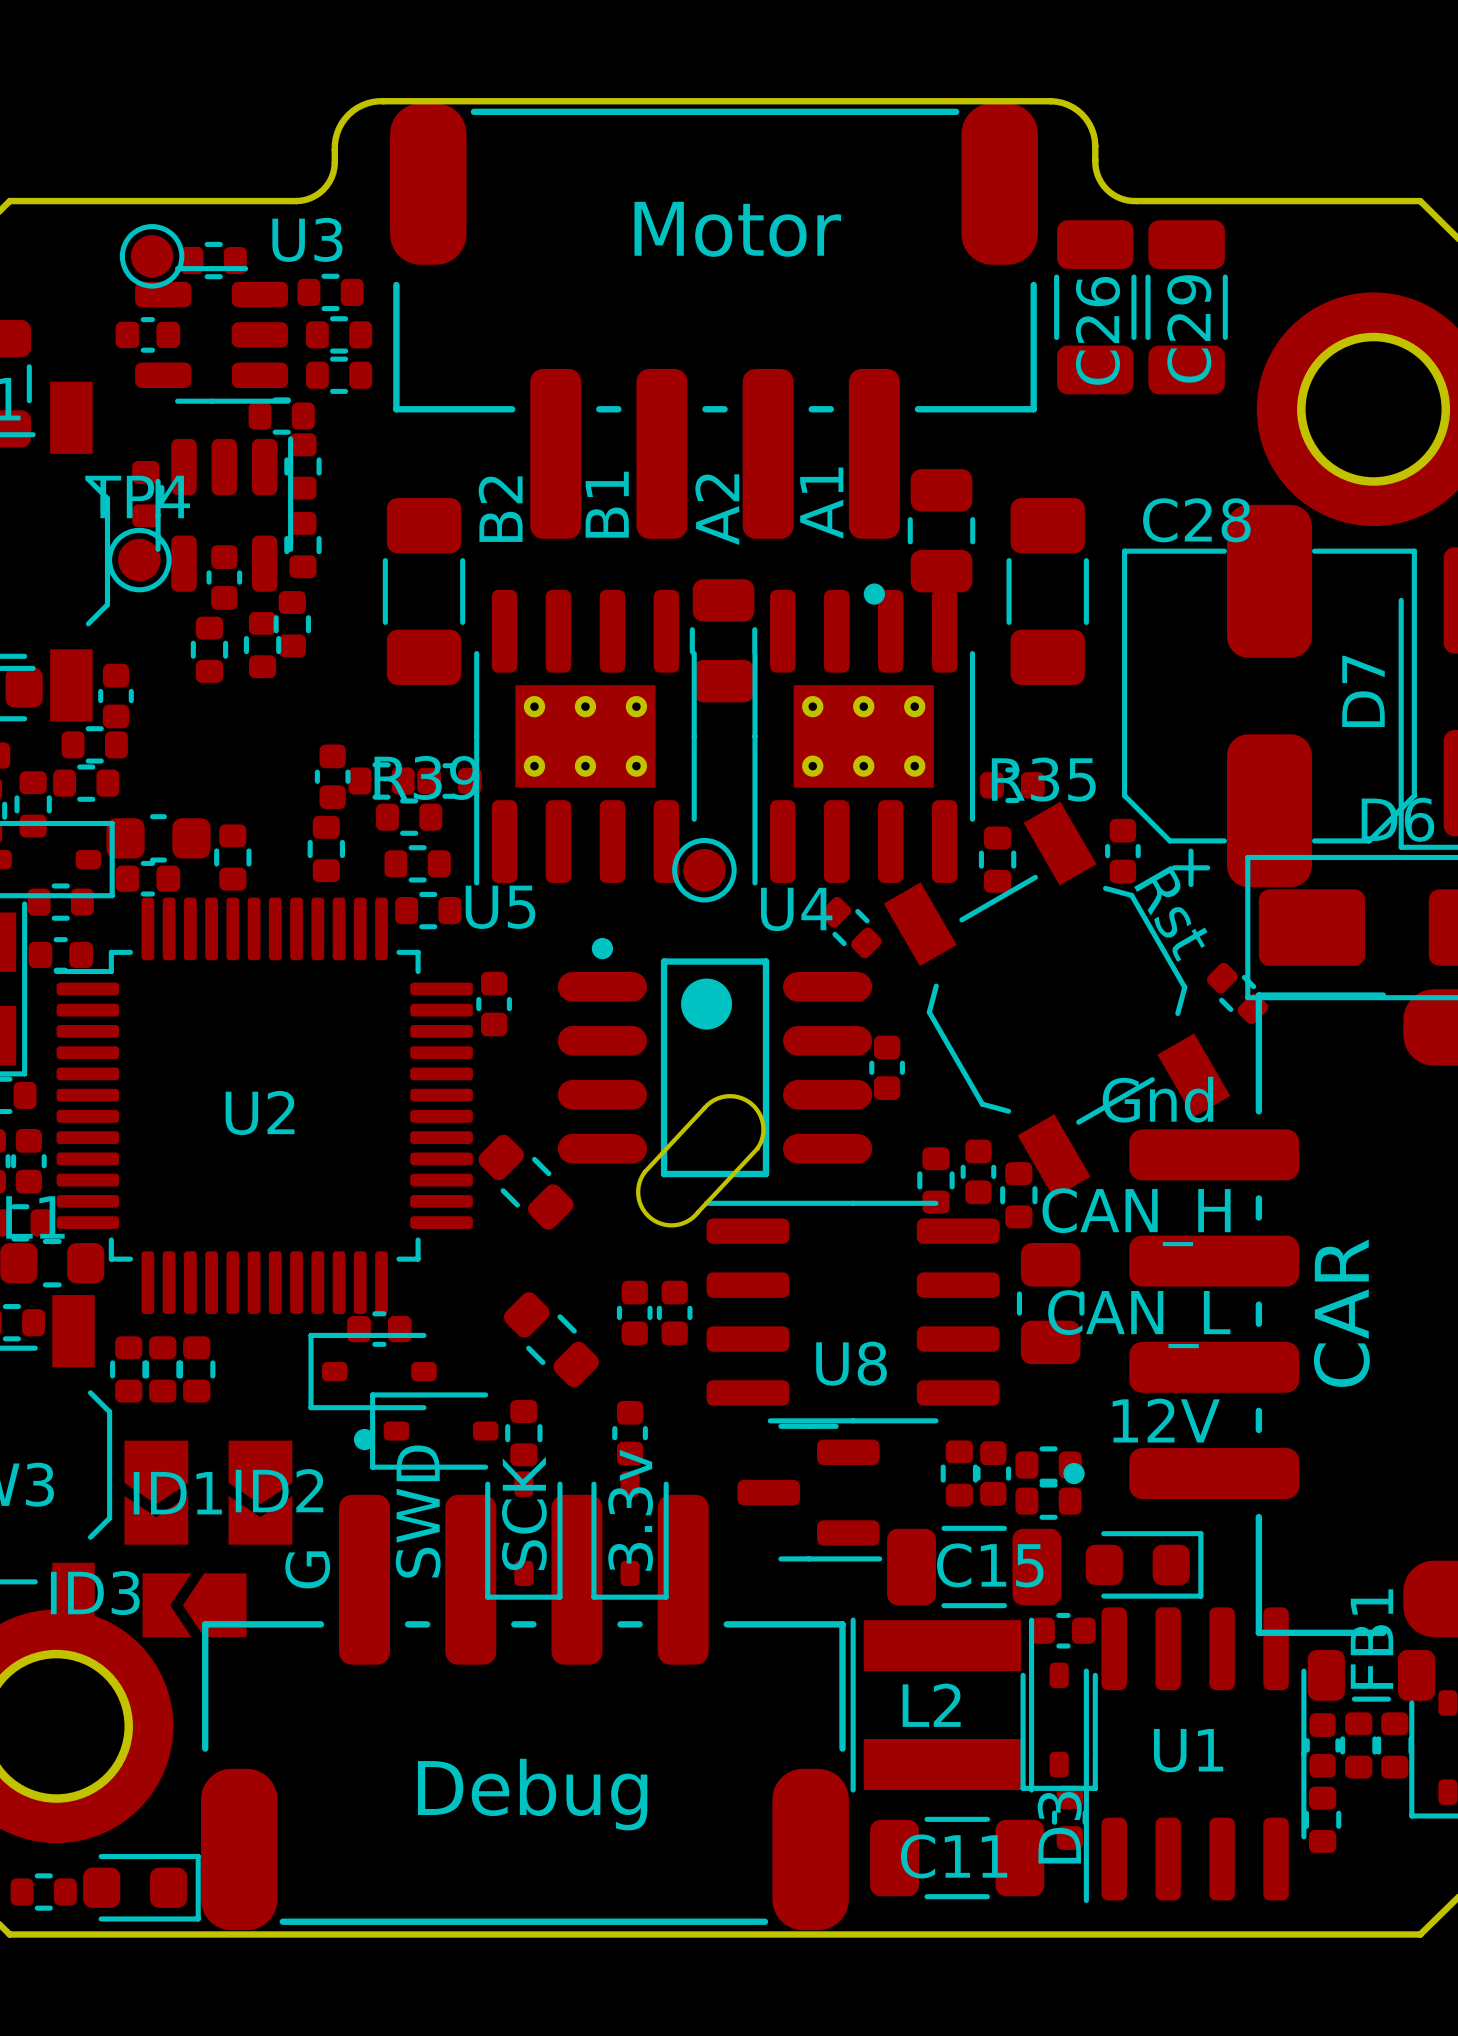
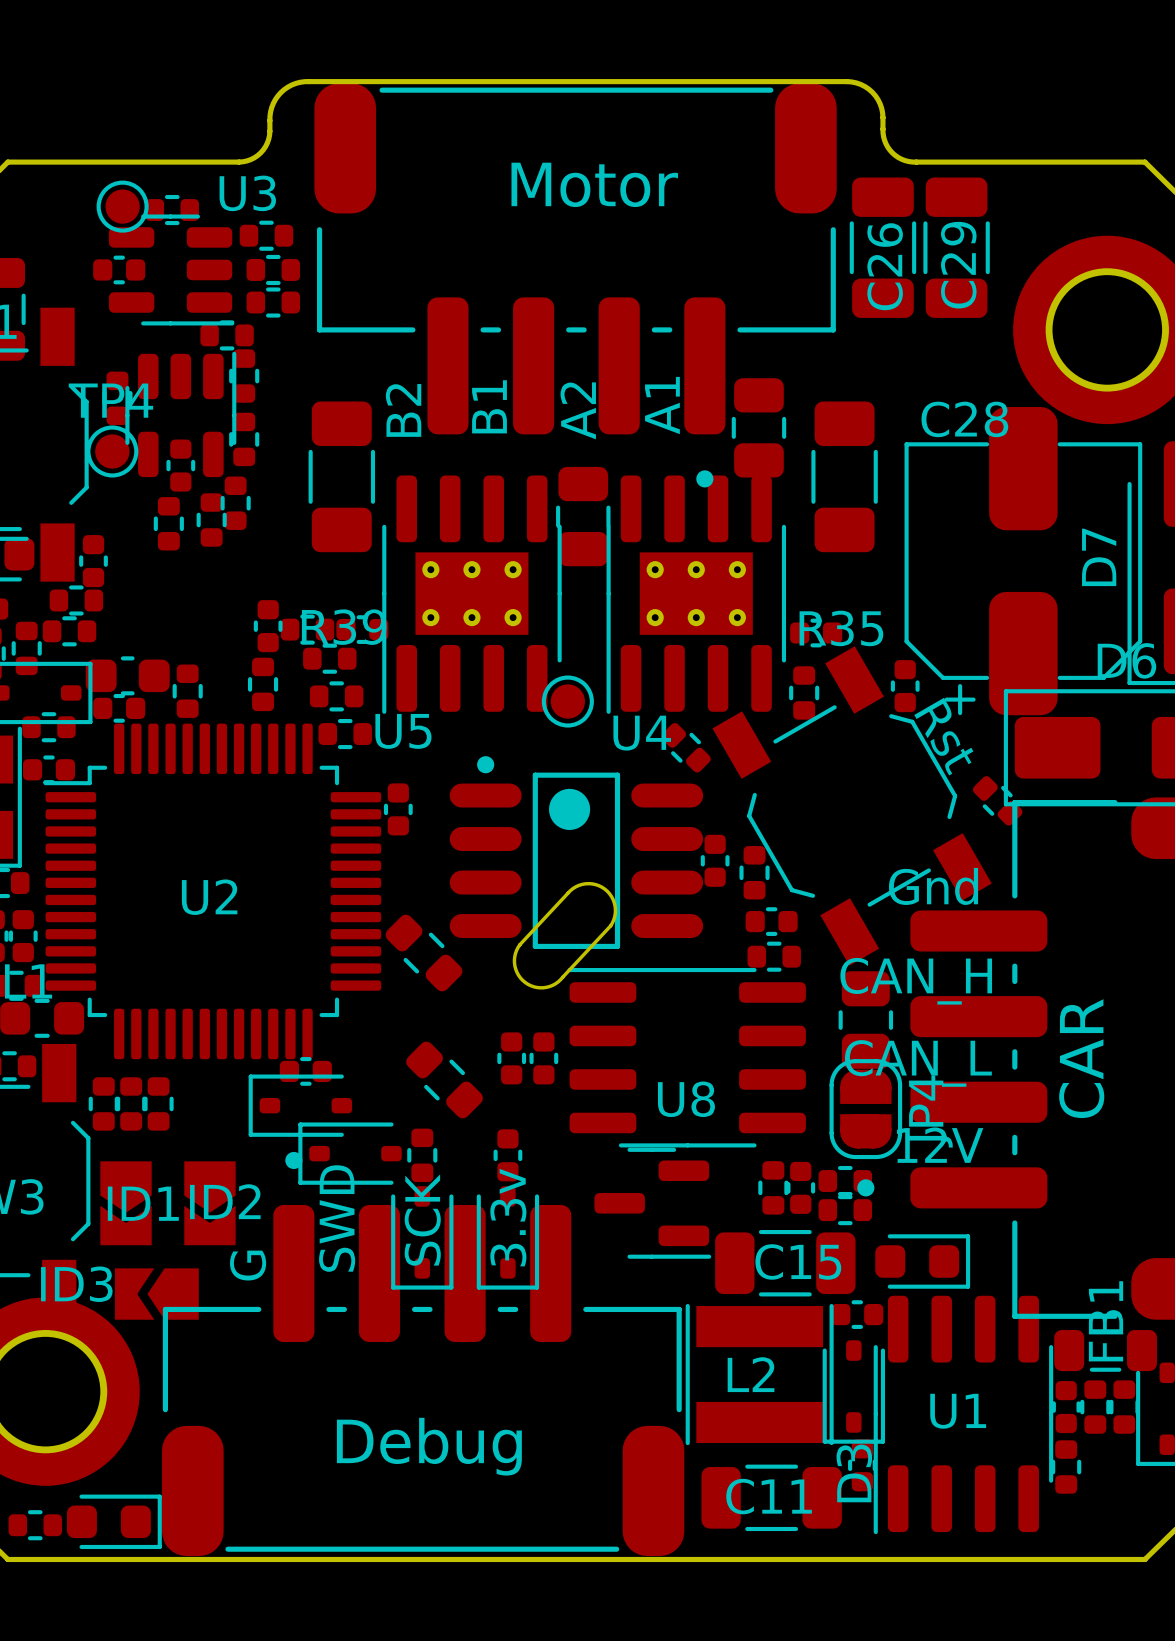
part: none -> (754, 872)
part rotation: 0° (978, 1171) -> 90° clockwise (771, 921)
part rotation: 0° (935, 1180) -> 90° clockwise (774, 956)
part: (1018, 1195) -> none
part position: (1050, 1303) -> (865, 1020)
JP4: none -> (865, 1109)

